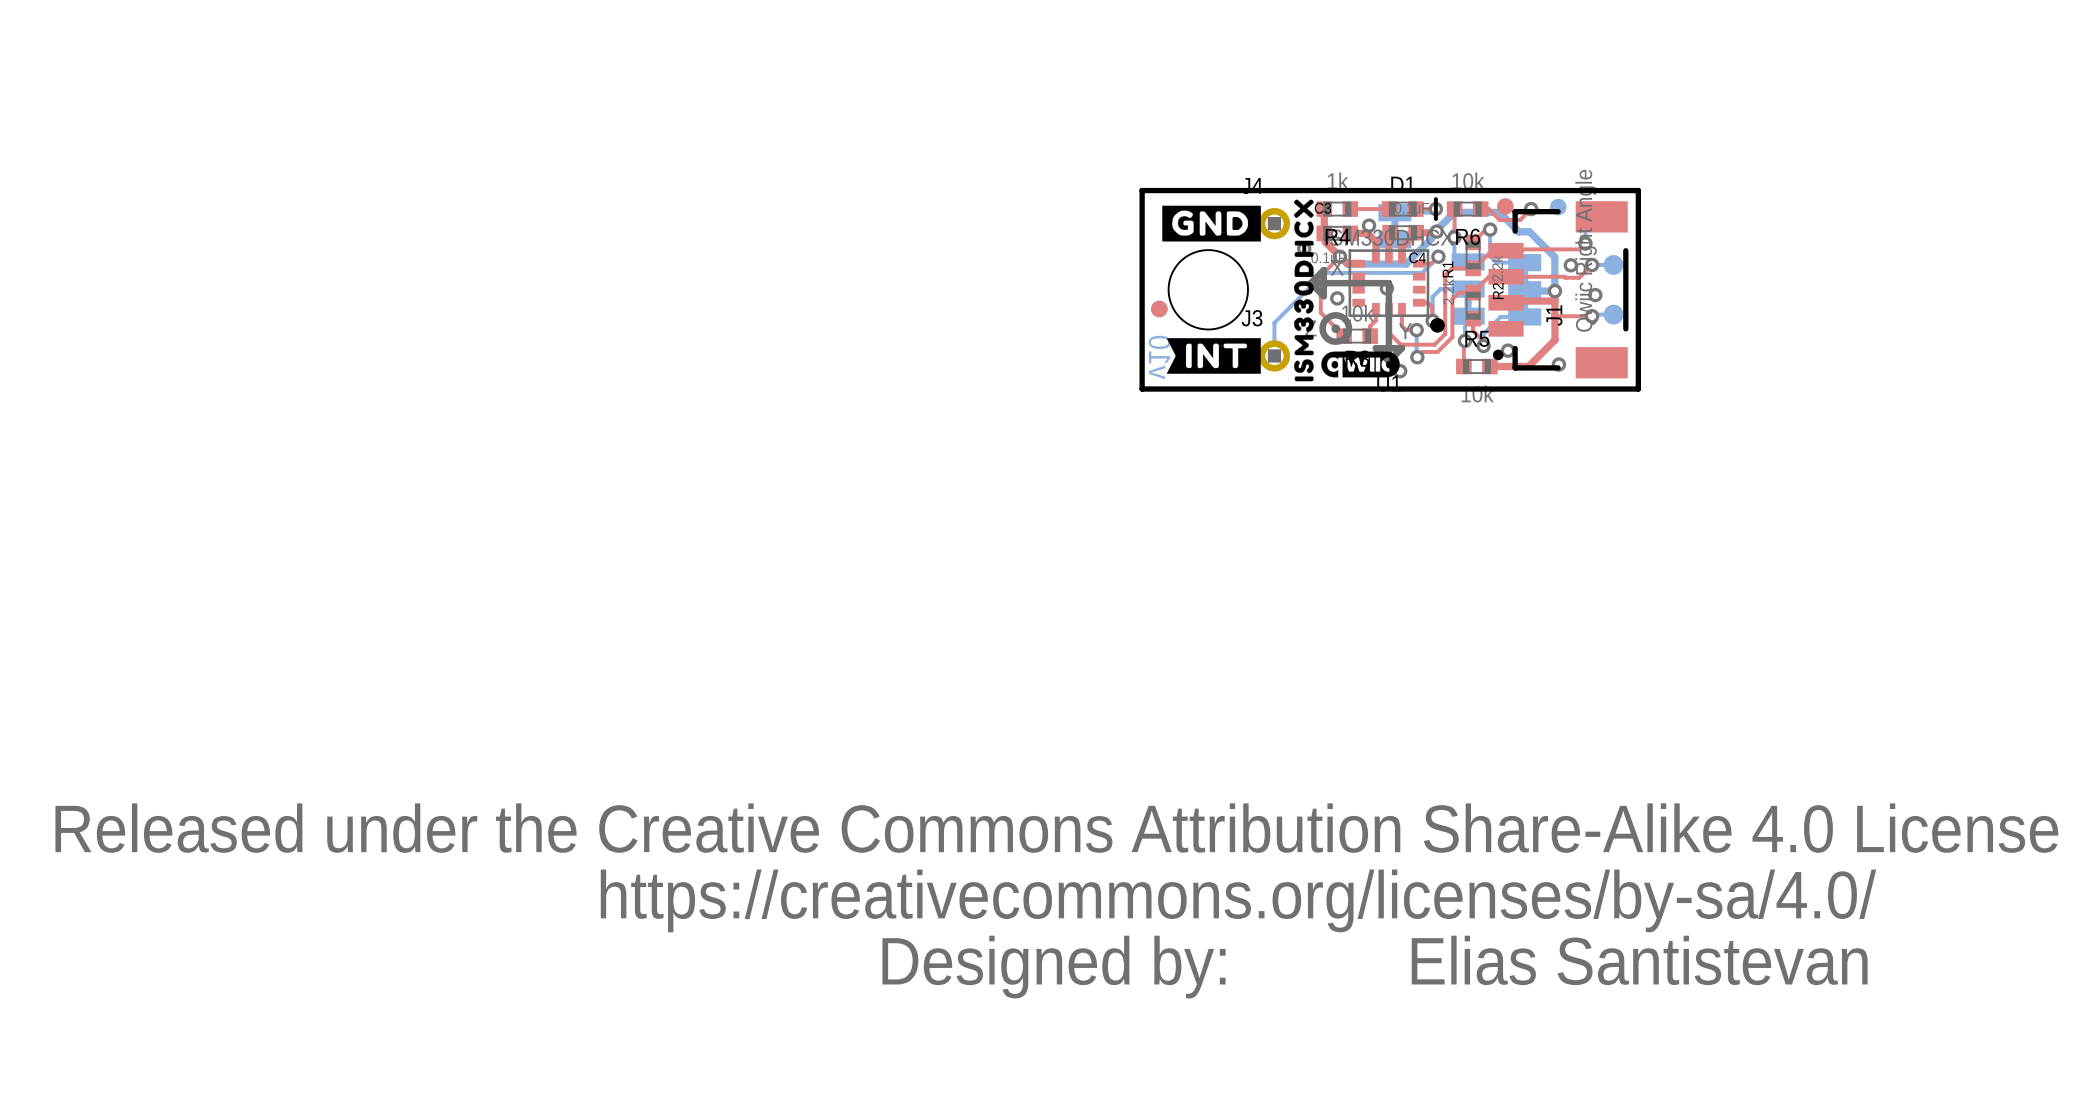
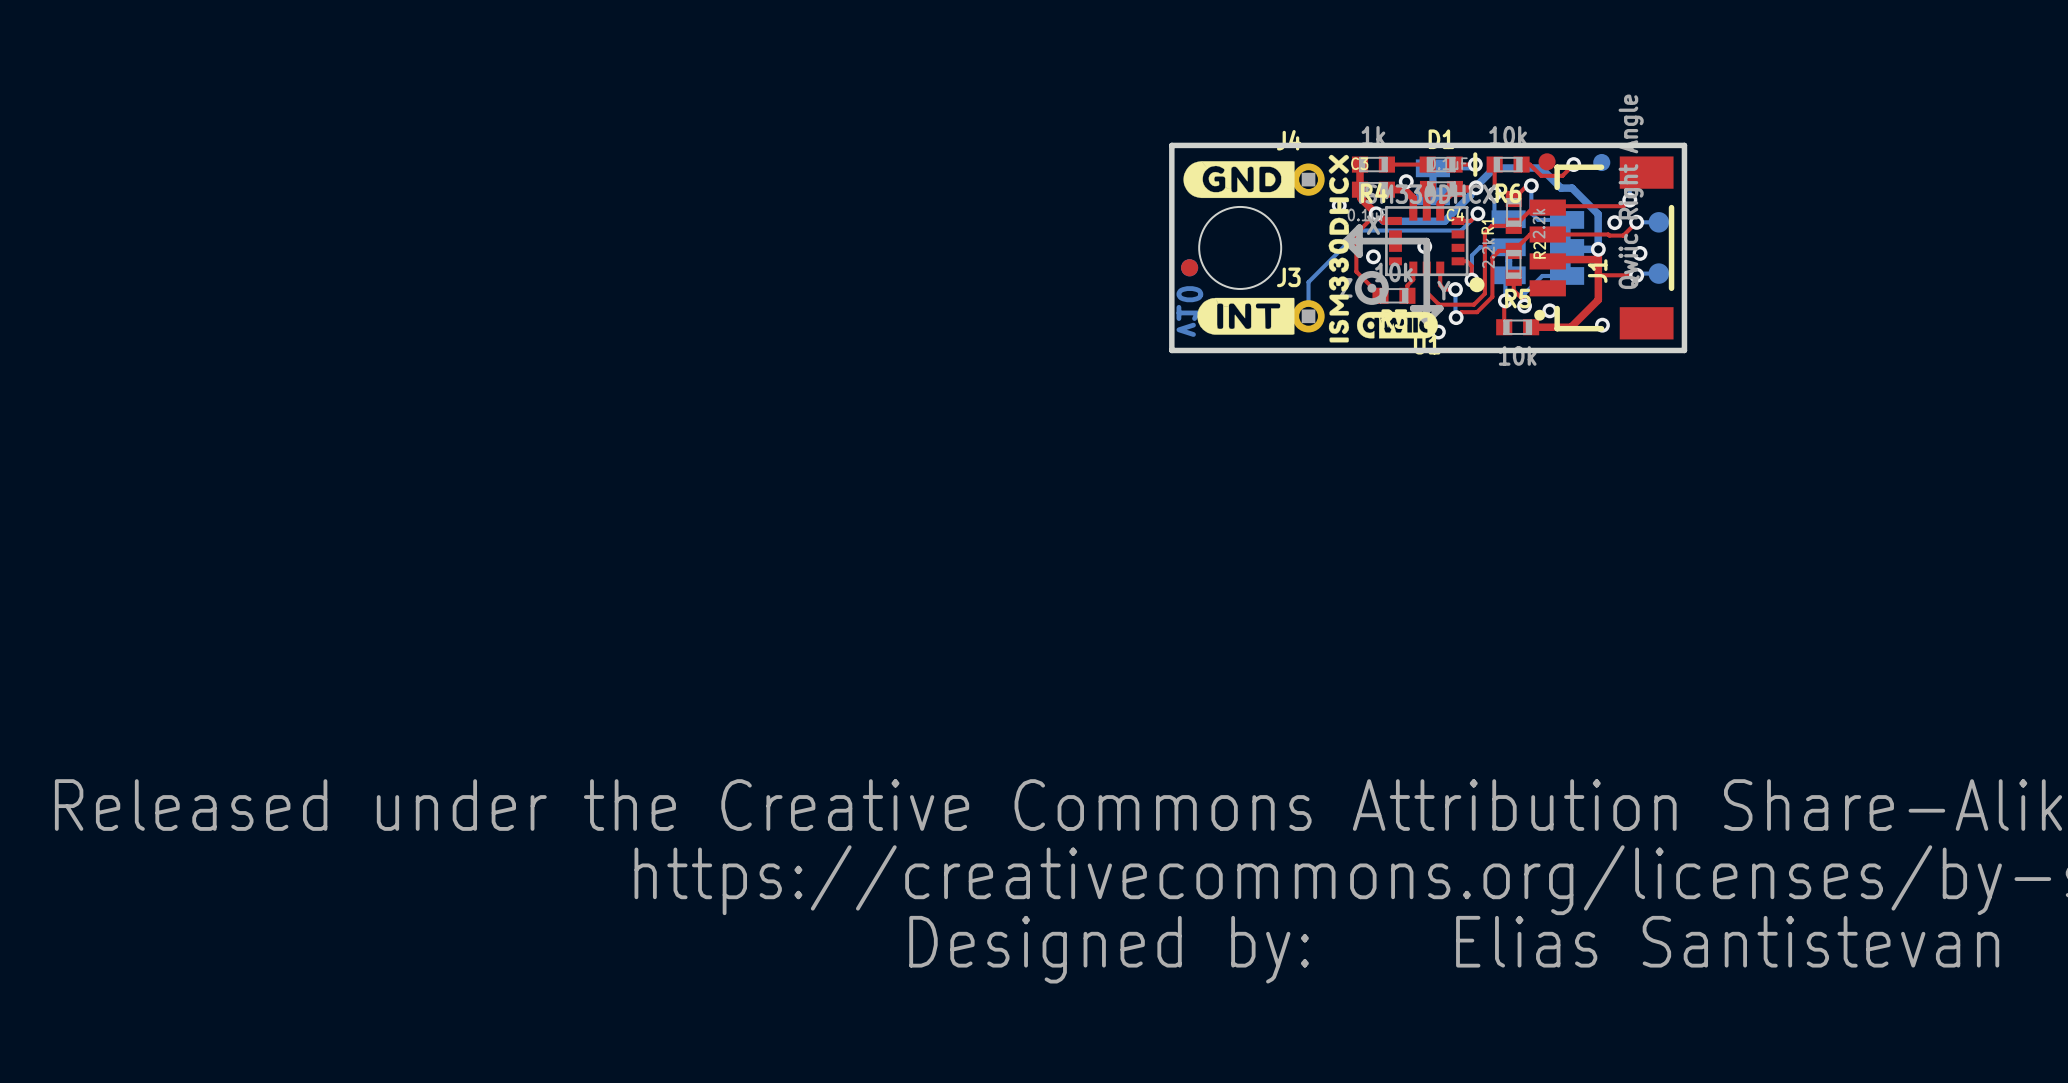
drawing shape: [1162, 205, 1261, 242] -> [1183, 161, 1295, 199]
drawing shape: [1166, 338, 1261, 374] -> [1197, 297, 1295, 335]

